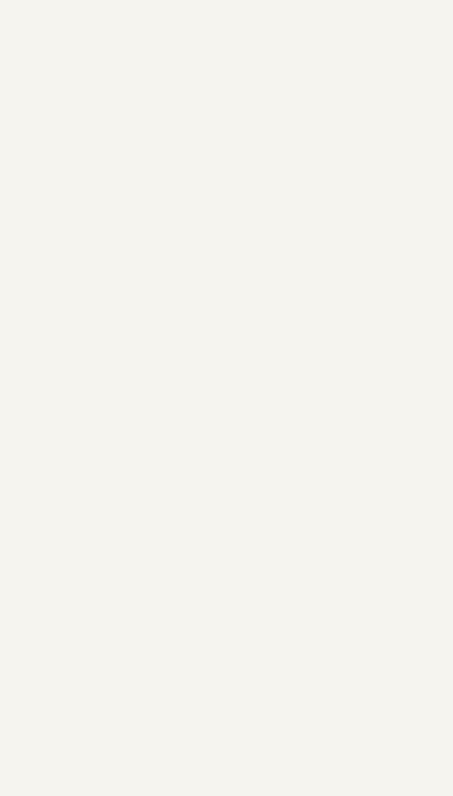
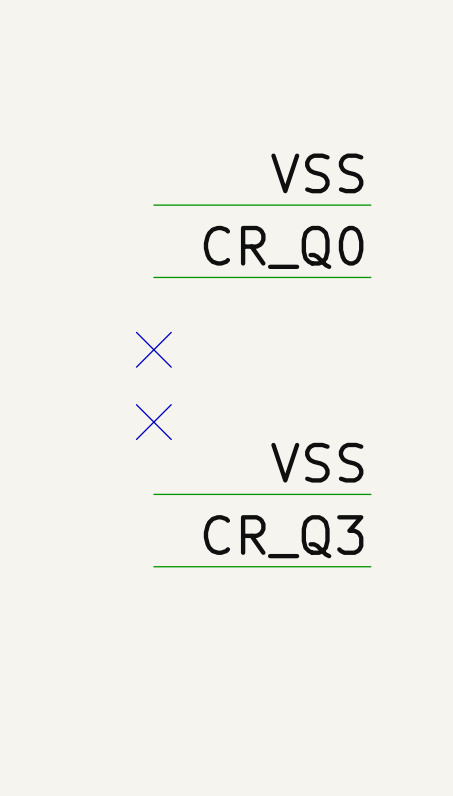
label: none -> VSS (317, 173)
wire: none -> (153, 205) (370, 205)
label: none -> CR_Q0 (283, 247)
wire: none -> (153, 277) (370, 277)
no-connect mark: none -> (153, 349)
no-connect mark: none -> (153, 422)
label: none -> VSS (317, 462)
wire: none -> (153, 494) (370, 494)
label: none -> CR_Q3 (283, 536)
wire: none -> (153, 566) (370, 566)

